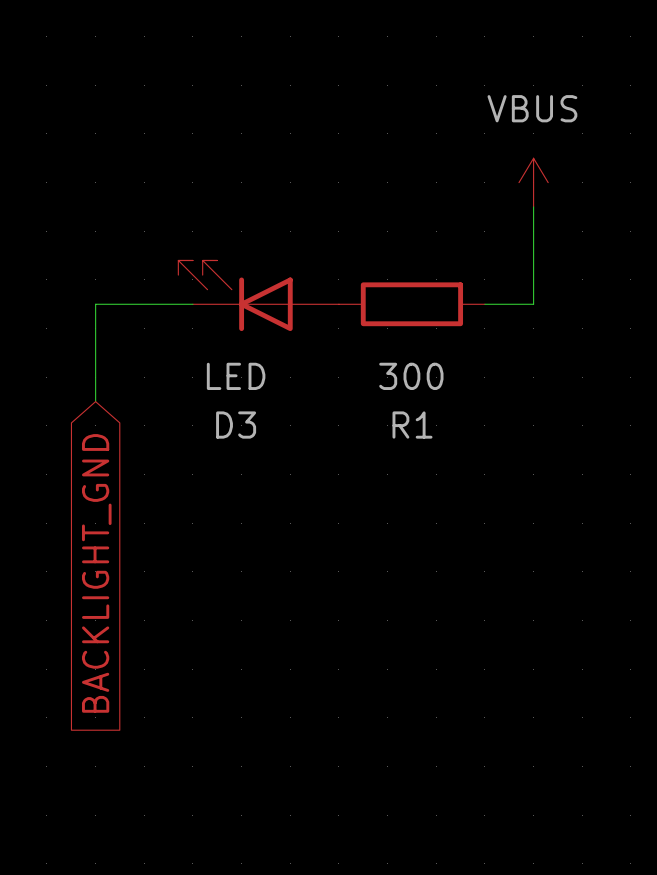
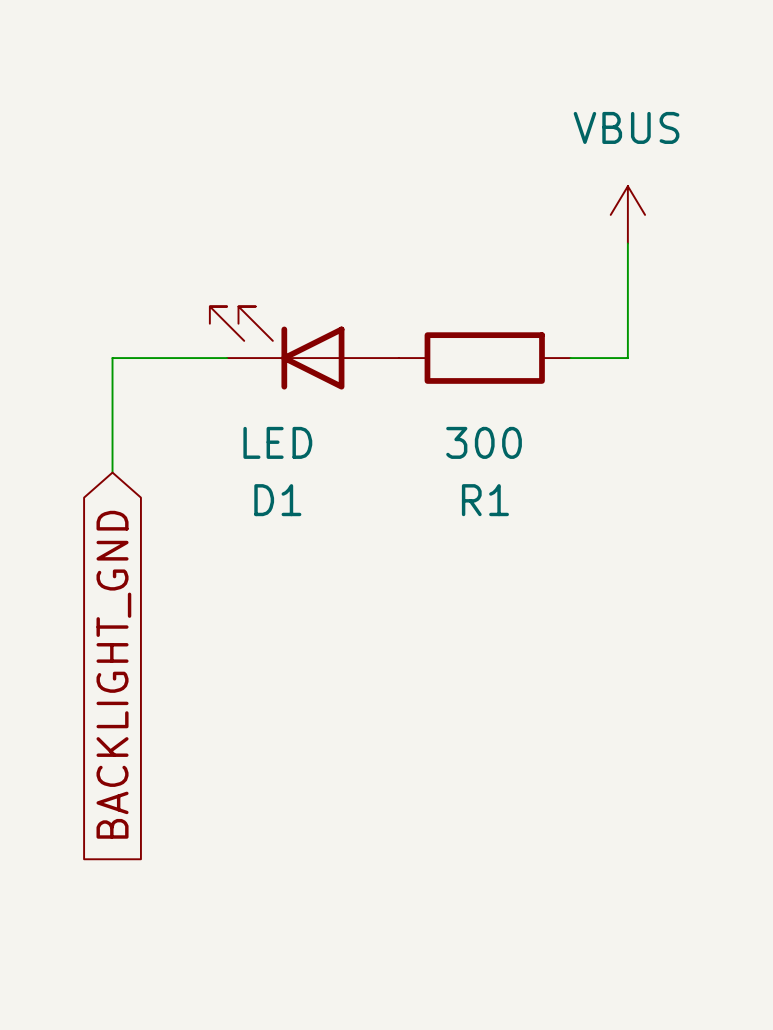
D3 name: D3 (236, 425) -> D1 (277, 500)

